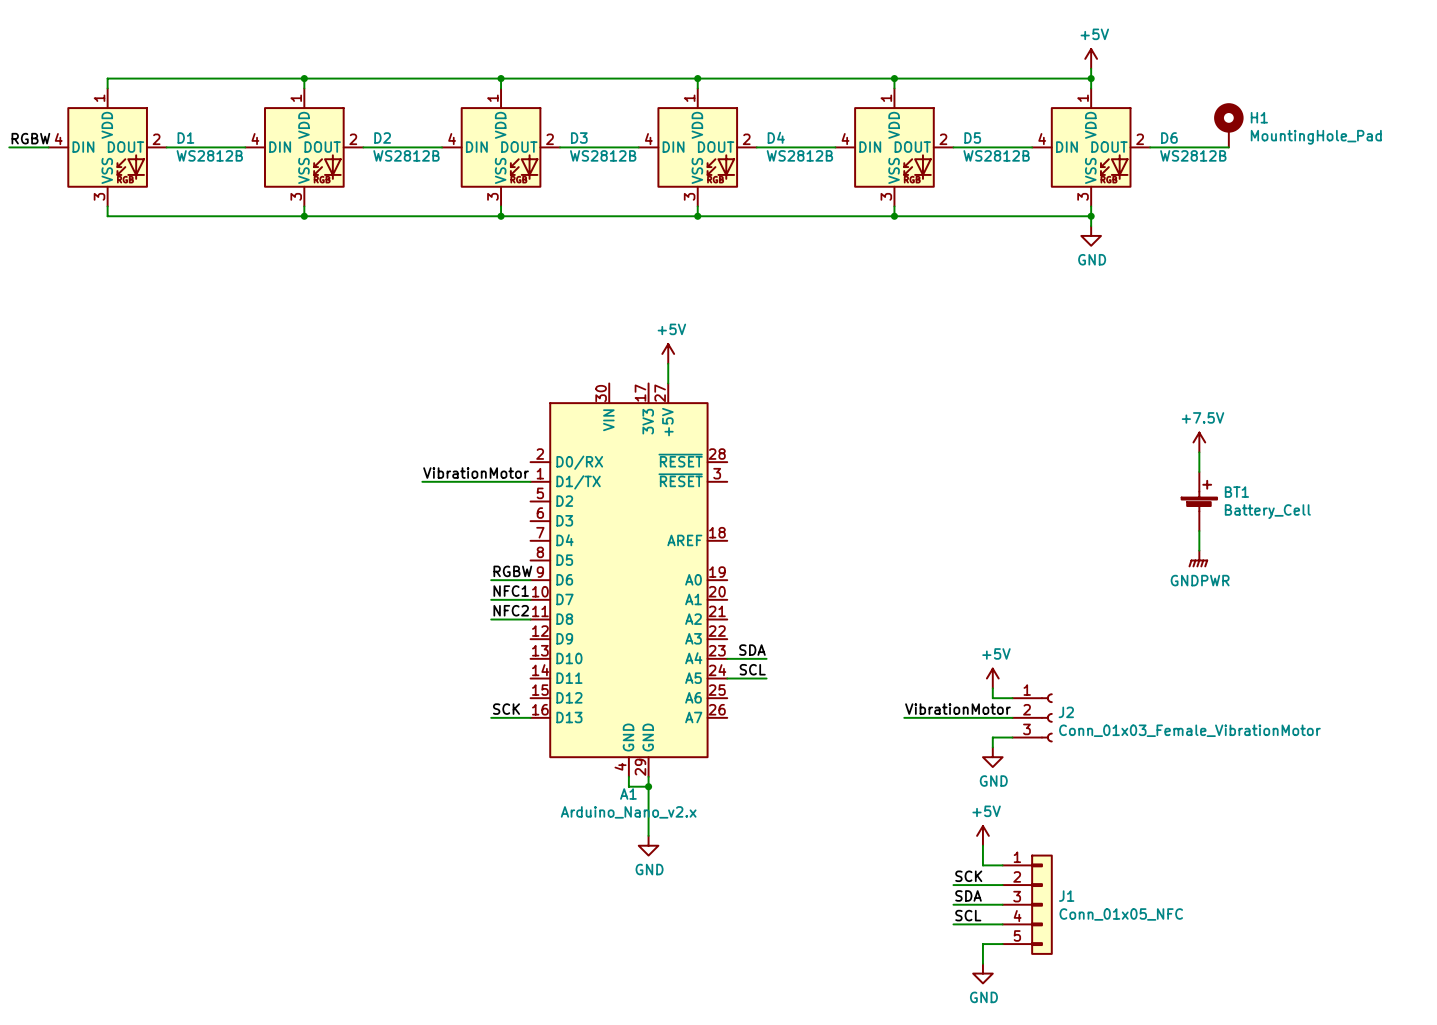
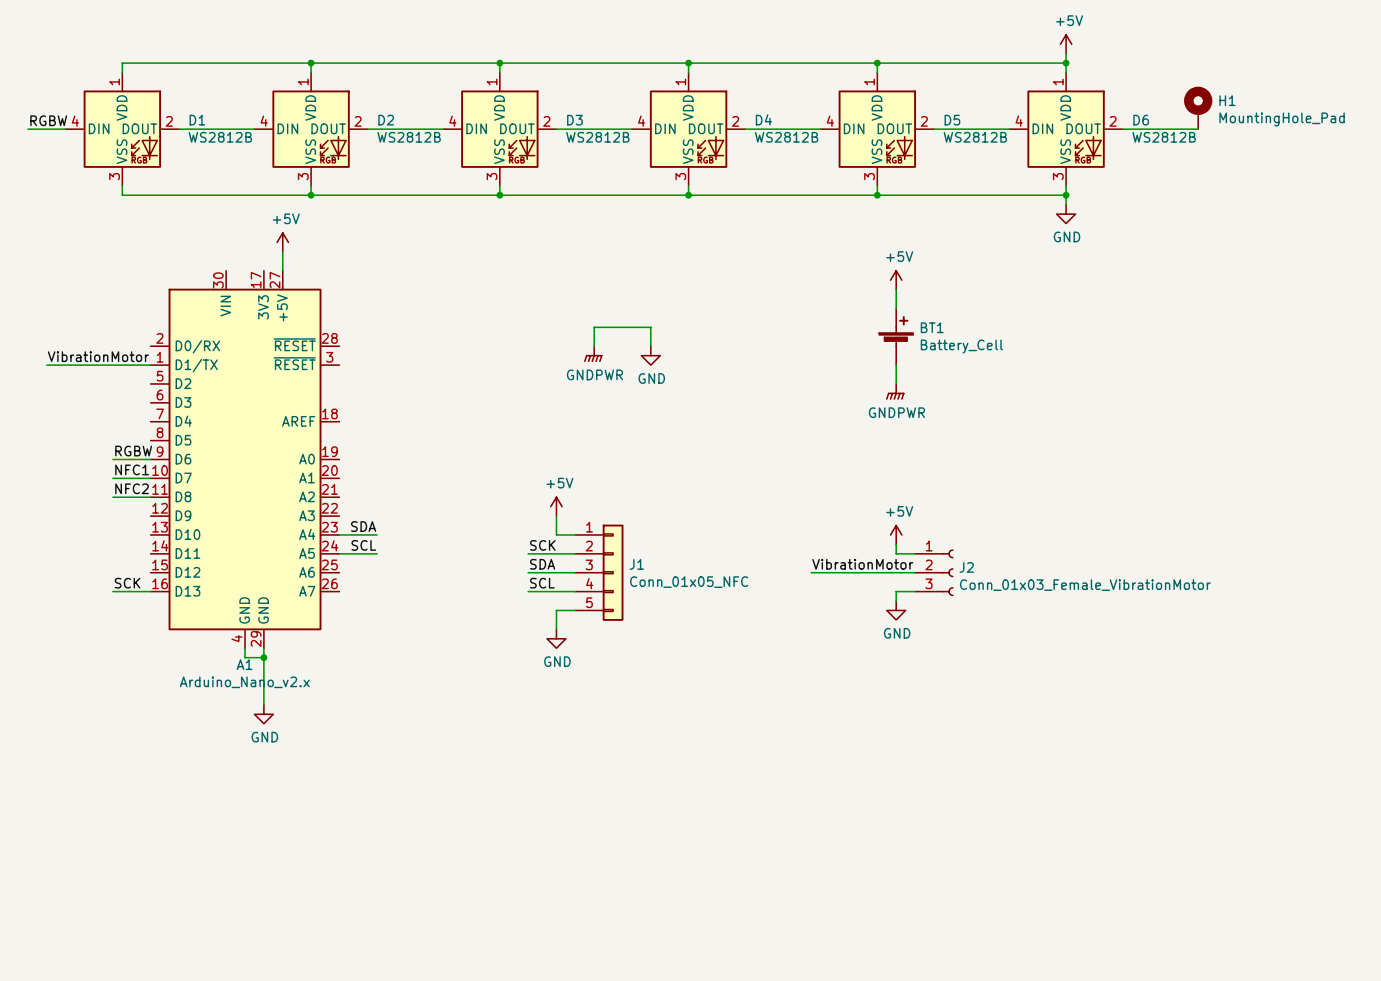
power symbol: none -> +5V (282, 242)
wire: none -> (282, 251) (282, 270)
power symbol: none -> +5V (896, 280)
wire: none -> (896, 289) (896, 308)
power symbol: +5V (668, 353) -> none
wire: (668, 363) (668, 383) -> none
wire: none -> (594, 346) (594, 327) (650, 327) (650, 346)
power symbol: none -> GNDPWR (593, 354)
power symbol: none -> GND (650, 355)
label: none -> VibrationMotor (98, 356)
wire: none -> (46, 365) (150, 365)
wire: none -> (896, 365) (896, 383)
power symbol: none -> GNDPWR (895, 391)
power symbol: +7.5V (1199, 442) -> none
wire: (1199, 452) (1199, 471) -> none
label: VibrationMotor (476, 473) -> none
wire: (422, 481) (530, 481) -> none
label: none -> RGBW (133, 451)
wire: none -> (112, 459) (150, 459)
BT1 position: (1199, 501) -> (896, 336)
label: none -> NFC1 (132, 469)
wire: none -> (112, 478) (150, 478)
label: none -> NFC2 (132, 488)
wire: none -> (112, 497) (150, 497)
wire: (1199, 530) (1199, 550) -> none
power symbol: none -> +5V (556, 506)
power symbol: GNDPWR (1198, 558) -> none
label: none -> SDA (363, 526)
label: RGBW (512, 571) -> none
wire: (491, 580) (530, 580) -> (339, 534) (377, 534)
A1 position: (628, 580) -> (245, 459)
label: none -> SCL (363, 545)
label: NFC1 (511, 591) -> none
wire: (491, 599) (530, 599) -> (339, 553) (377, 553)
label: none -> SDA (542, 564)
label: NFC2 (511, 610) -> none
wire: (491, 619) (530, 619) -> none
label: none -> SCK (127, 583)
label: none -> SCL (542, 583)
wire: none -> (112, 591) (150, 591)
label: SDA (752, 650) -> none
wire: (727, 658) (766, 658) -> none
label: SCL (752, 669) -> none
power symbol: none -> GND (556, 638)
wire: (727, 678) (766, 678) -> none
power symbol position: +5V (992, 678) -> +5V (896, 534)
wire: none -> (245, 648) (245, 657) (263, 657)
wire: none -> (263, 648) (263, 704)
wire: (992, 688) (992, 698) (1012, 698) -> (896, 544) (896, 553) (915, 553)
junction: none -> (263, 657)
label position: SCK (506, 709) -> SCK (542, 545)
label position: VibrationMotor (957, 709) -> VibrationMotor (862, 564)
wire: (491, 717) (530, 717) -> none
wire: (904, 717) (1012, 717) -> (811, 572) (915, 572)
J2 position: (1032, 717) -> (934, 572)
wire: (1012, 737) (992, 737) (992, 747) -> (915, 591) (896, 591) (896, 601)
power symbol: none -> GND (263, 714)
power symbol position: GND (992, 757) -> GND (896, 610)
wire: (628, 776) (628, 786) (648, 786) -> none
wire: (648, 776) (648, 835) -> none
junction: (648, 786) -> none
power symbol: +5V (982, 835) -> none
power symbol: GND (648, 845) -> none
wire: (982, 845) (982, 865) (1002, 865) -> none
label: SCK (968, 876) -> none
wire: (953, 885) (1002, 885) -> none
label: SDA (968, 895) -> none
wire: (953, 904) (1002, 904) -> none
J1 position: (1027, 904) -> (599, 572)
label: SCL (968, 915) -> none
wire: (953, 924) (1002, 924) -> none
wire: (1002, 944) (982, 944) (982, 963) -> none
power symbol: GND (982, 973) -> none

